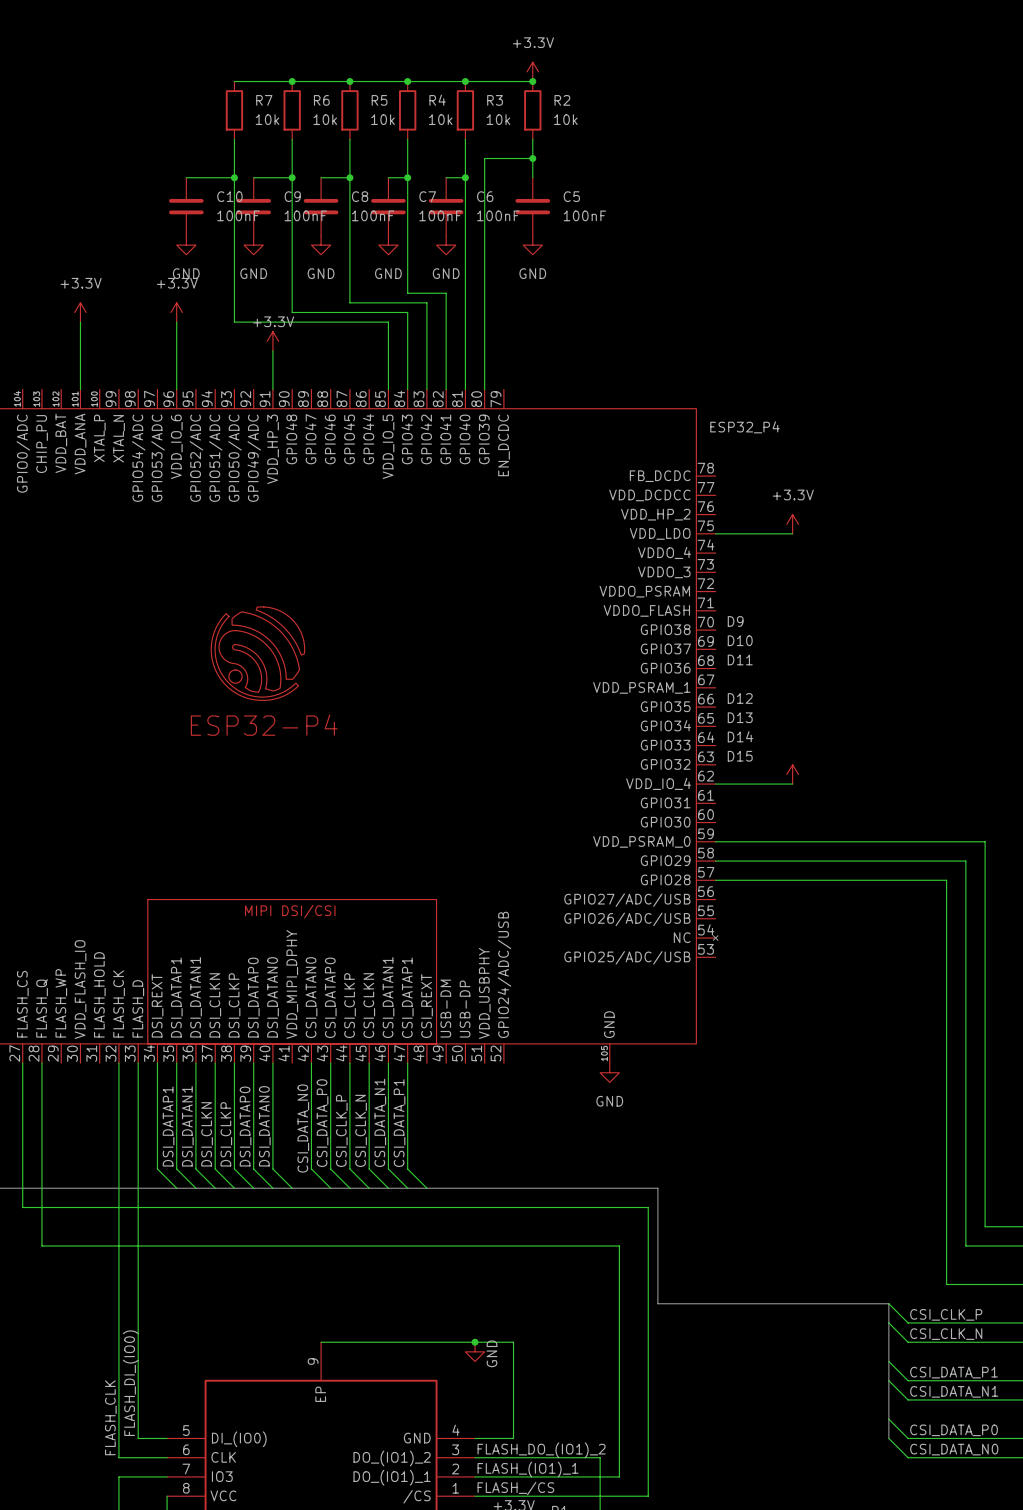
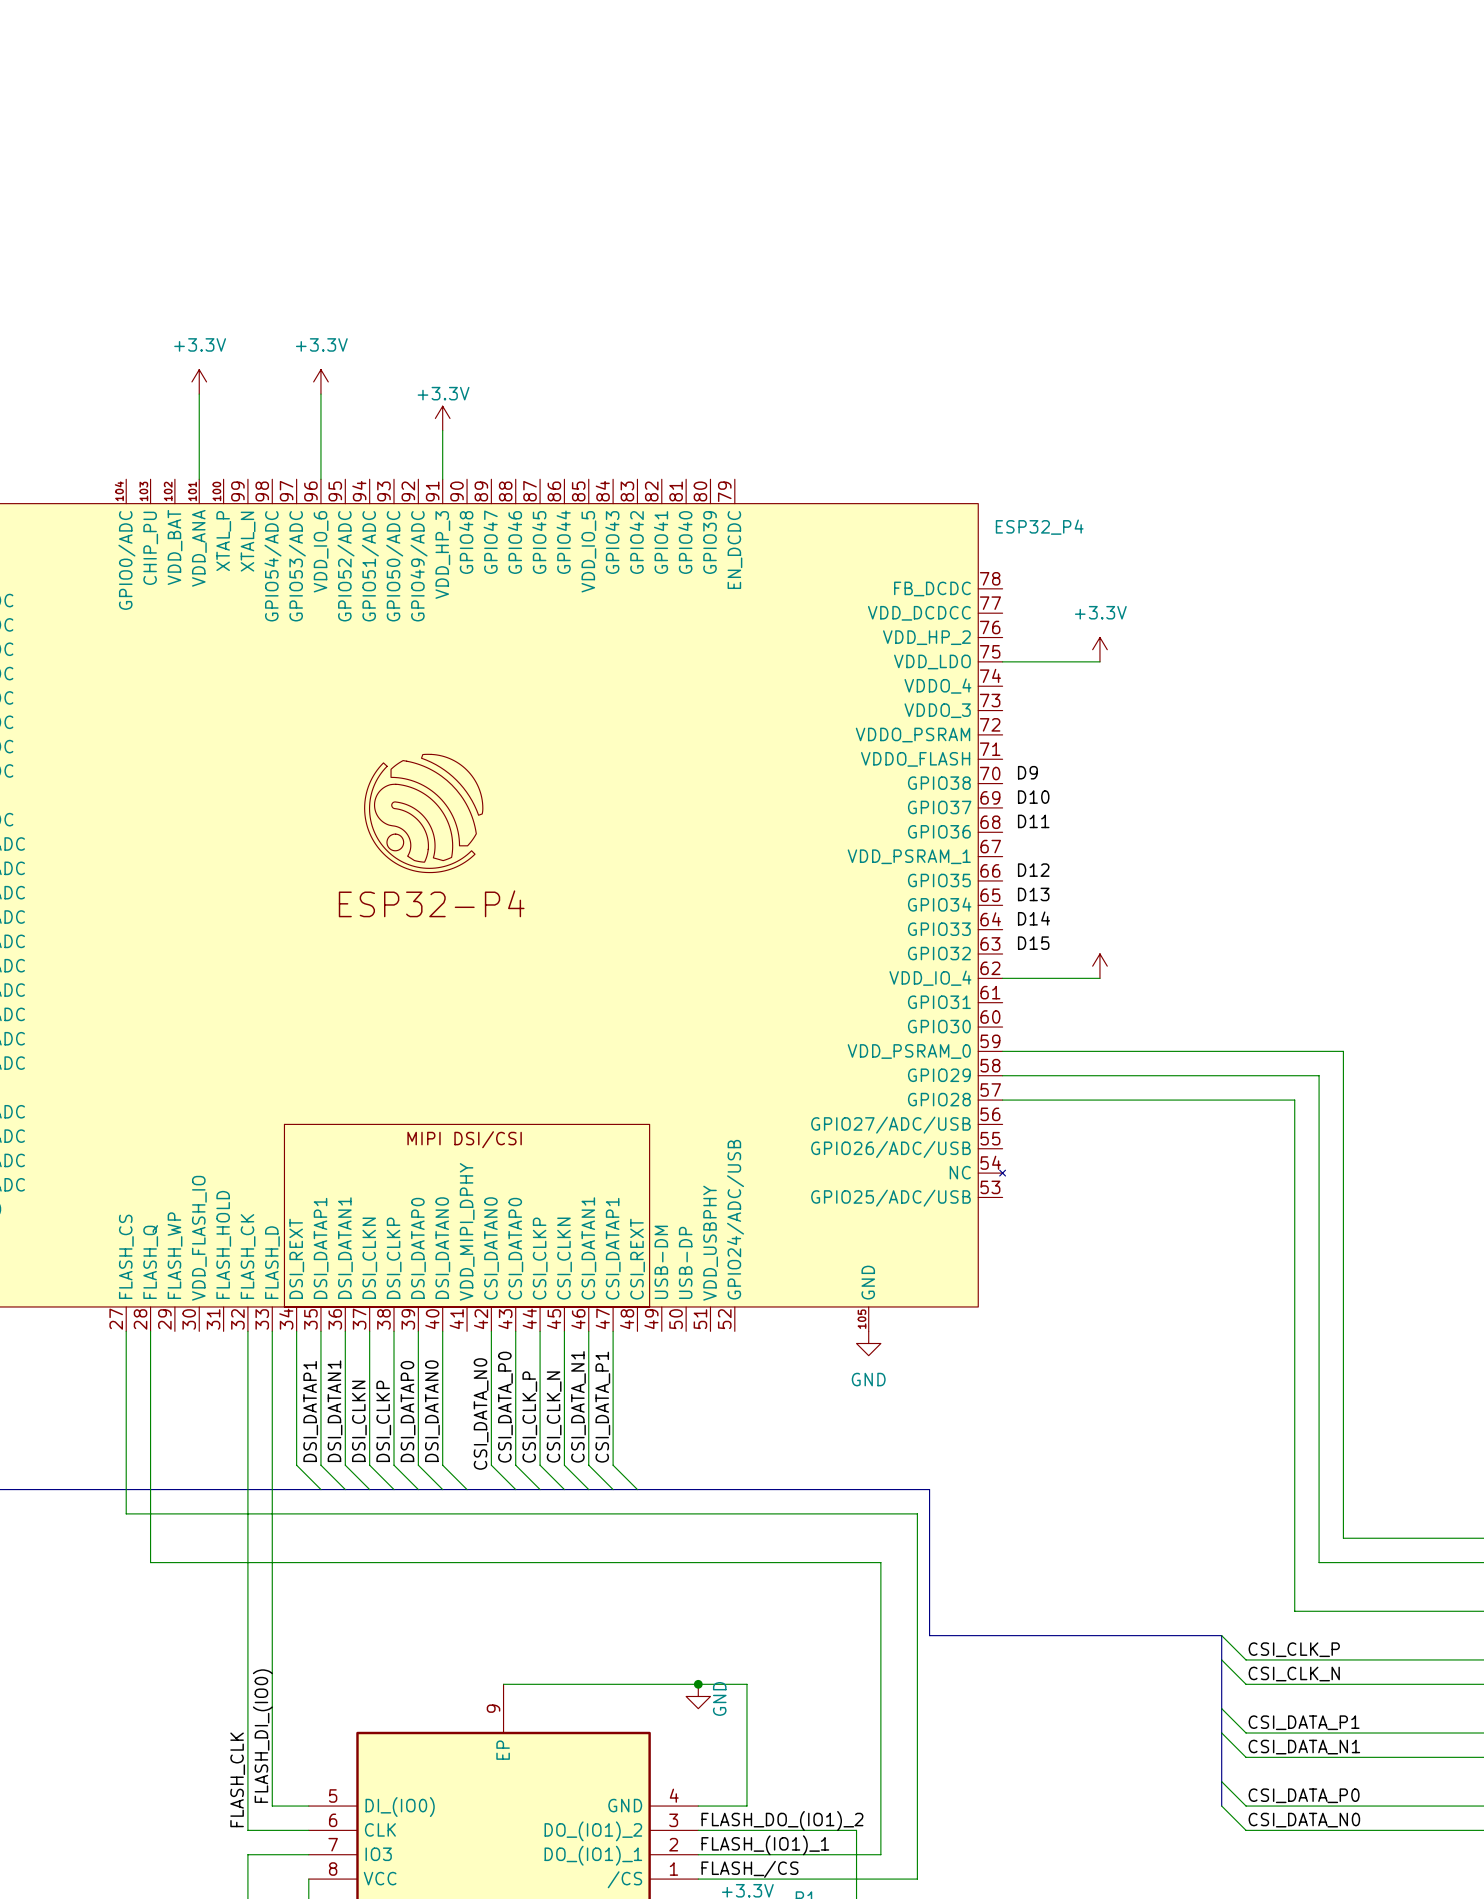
power symbol: +3.3V (532, 71) -> none
wire: (234, 81) (532, 81) -> none
junction: (292, 81) -> none
junction: (349, 81) -> none
junction: (407, 81) -> none
junction: (465, 81) -> none
junction: (532, 81) -> none
R7: 10k (234, 110) -> none
R6: 10k (292, 110) -> none
R5: 10k (349, 110) -> none
R4: 10k (407, 110) -> none
R3: 10k (465, 110) -> none
R2: 10k (532, 110) -> none
wire: (234, 139) (234, 322) (388, 322) (388, 389) -> none
wire: (292, 139) (292, 312) (407, 312) (407, 389) -> none
wire: (349, 139) (349, 302) (426, 302) (426, 389) -> none
wire: (407, 139) (407, 293) (446, 293) (446, 389) -> none
wire: (465, 139) (465, 389) -> none
wire: (532, 139) (532, 177) -> none
wire: (532, 158) (484, 158) (484, 389) -> none
junction: (532, 158) -> none
wire: (186, 177) (234, 177) -> none
junction: (234, 177) -> none
wire: (253, 177) (292, 177) -> none
junction: (292, 177) -> none
wire: (321, 177) (349, 177) -> none
junction: (349, 177) -> none
wire: (388, 177) (407, 177) -> none
junction: (407, 177) -> none
wire: (446, 177) (465, 177) -> none
junction: (465, 177) -> none
C10: 100nF (186, 206) -> none
C9: 100nF (253, 206) -> none
C8: 100nF (321, 206) -> none
C7: 100nF (388, 206) -> none
C6: 100nF (446, 206) -> none
C5: 100nF (532, 206) -> none
power symbol: GND (186, 245) -> none
power symbol: GND (253, 245) -> none
power symbol: GND (321, 245) -> none
power symbol: GND (388, 245) -> none
power symbol: GND (446, 245) -> none
power symbol: GND (532, 245) -> none

